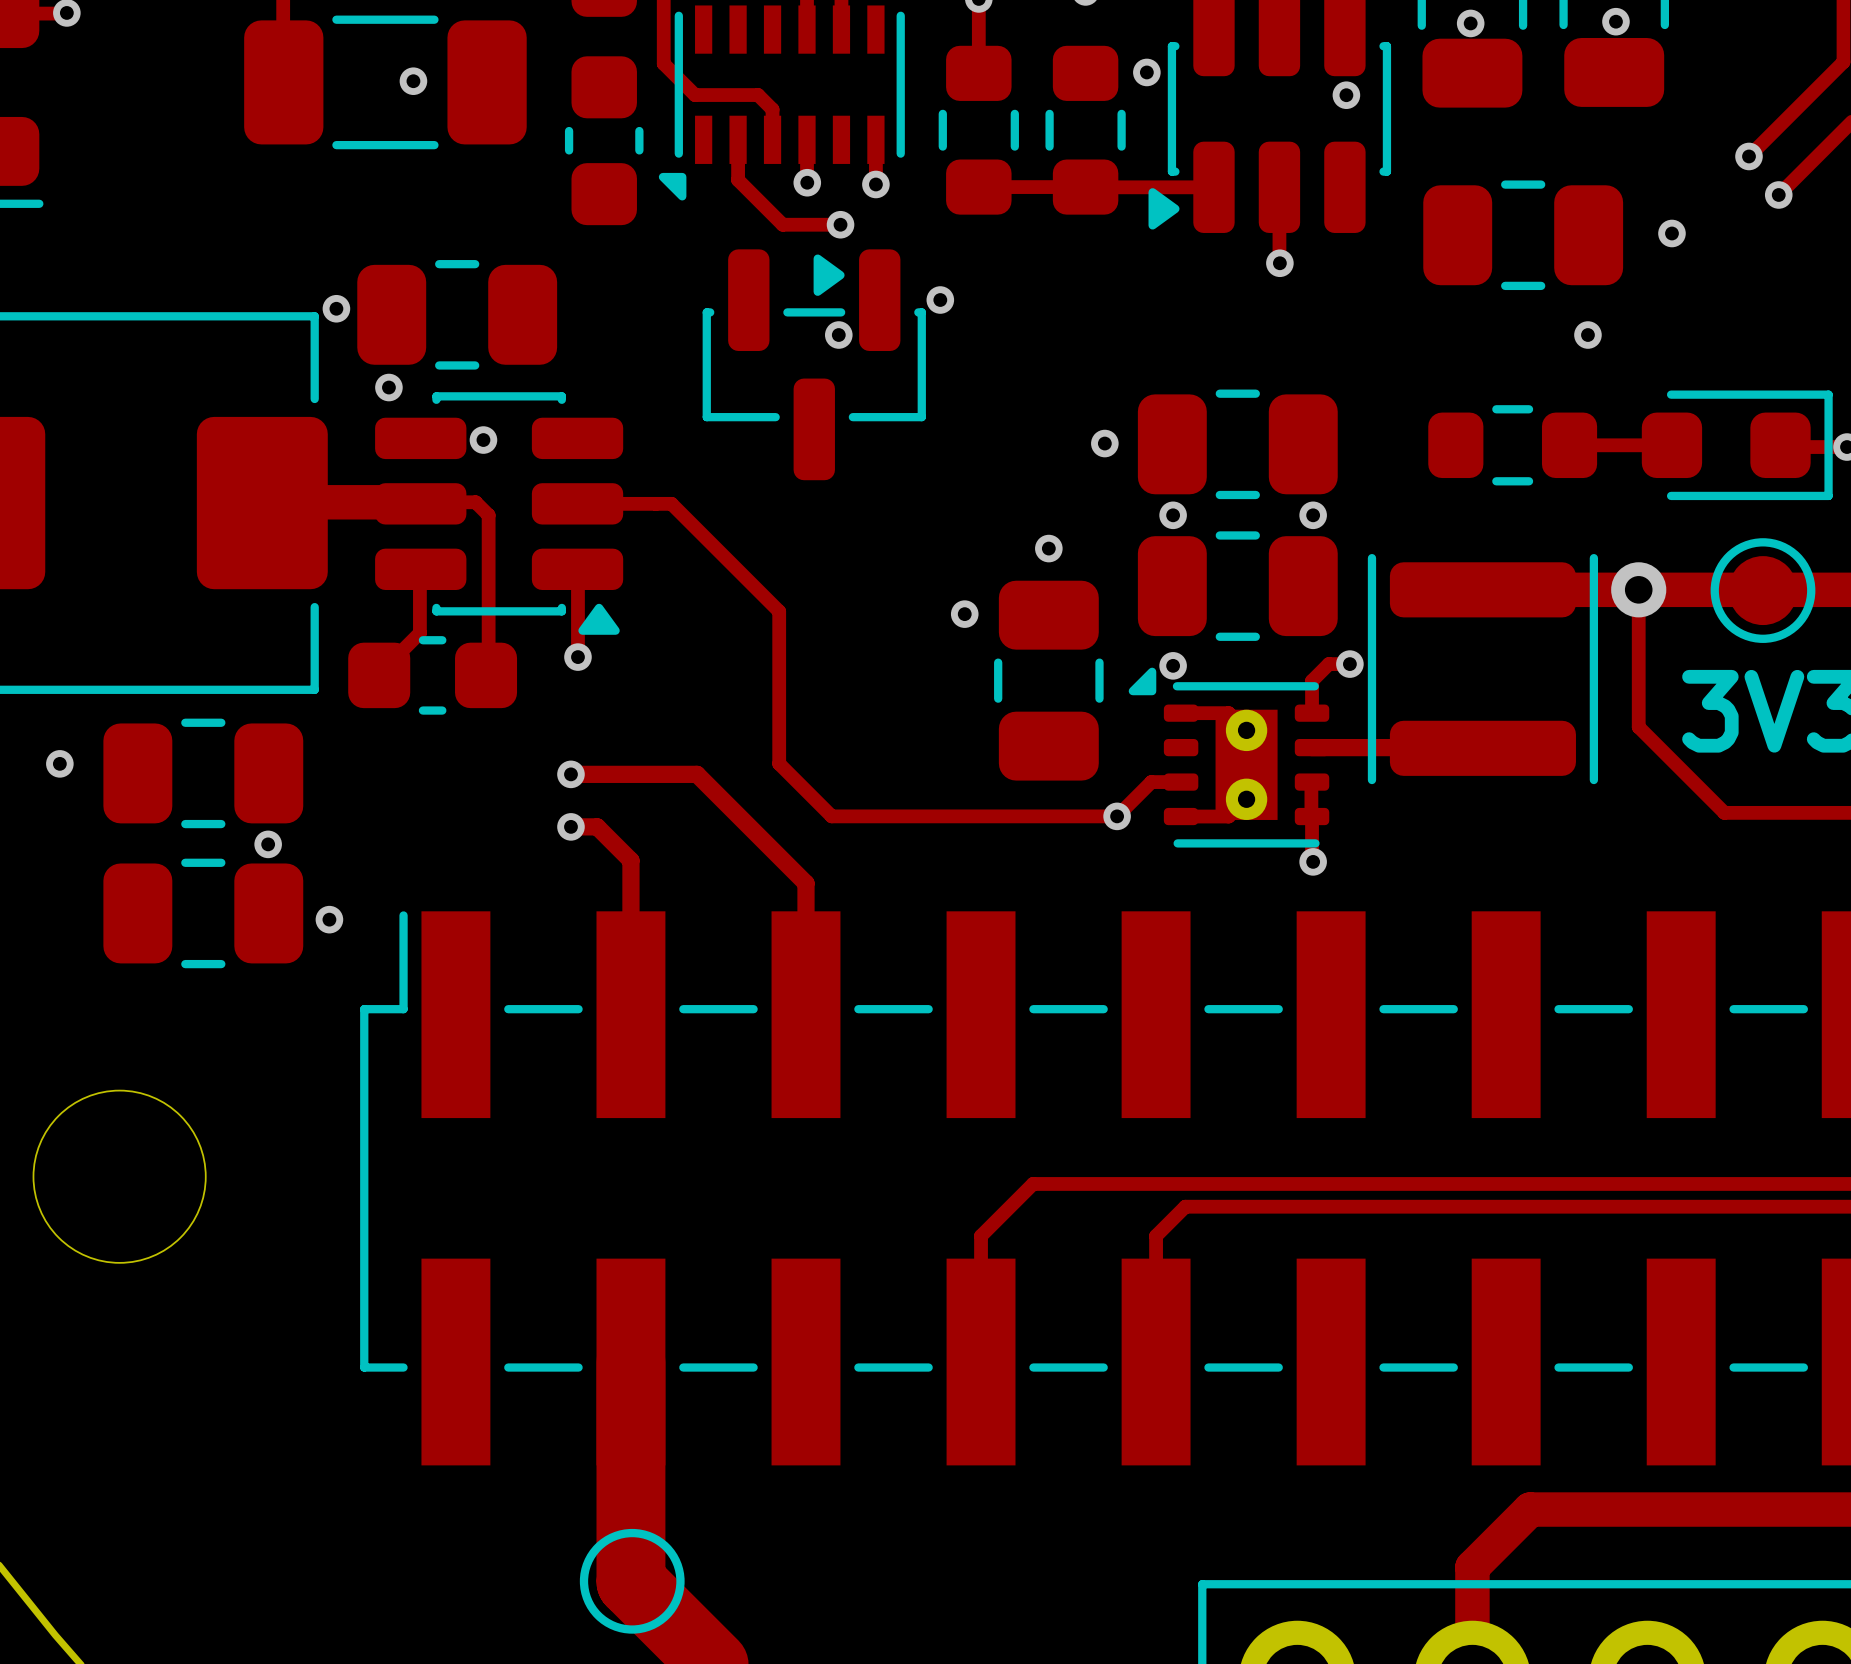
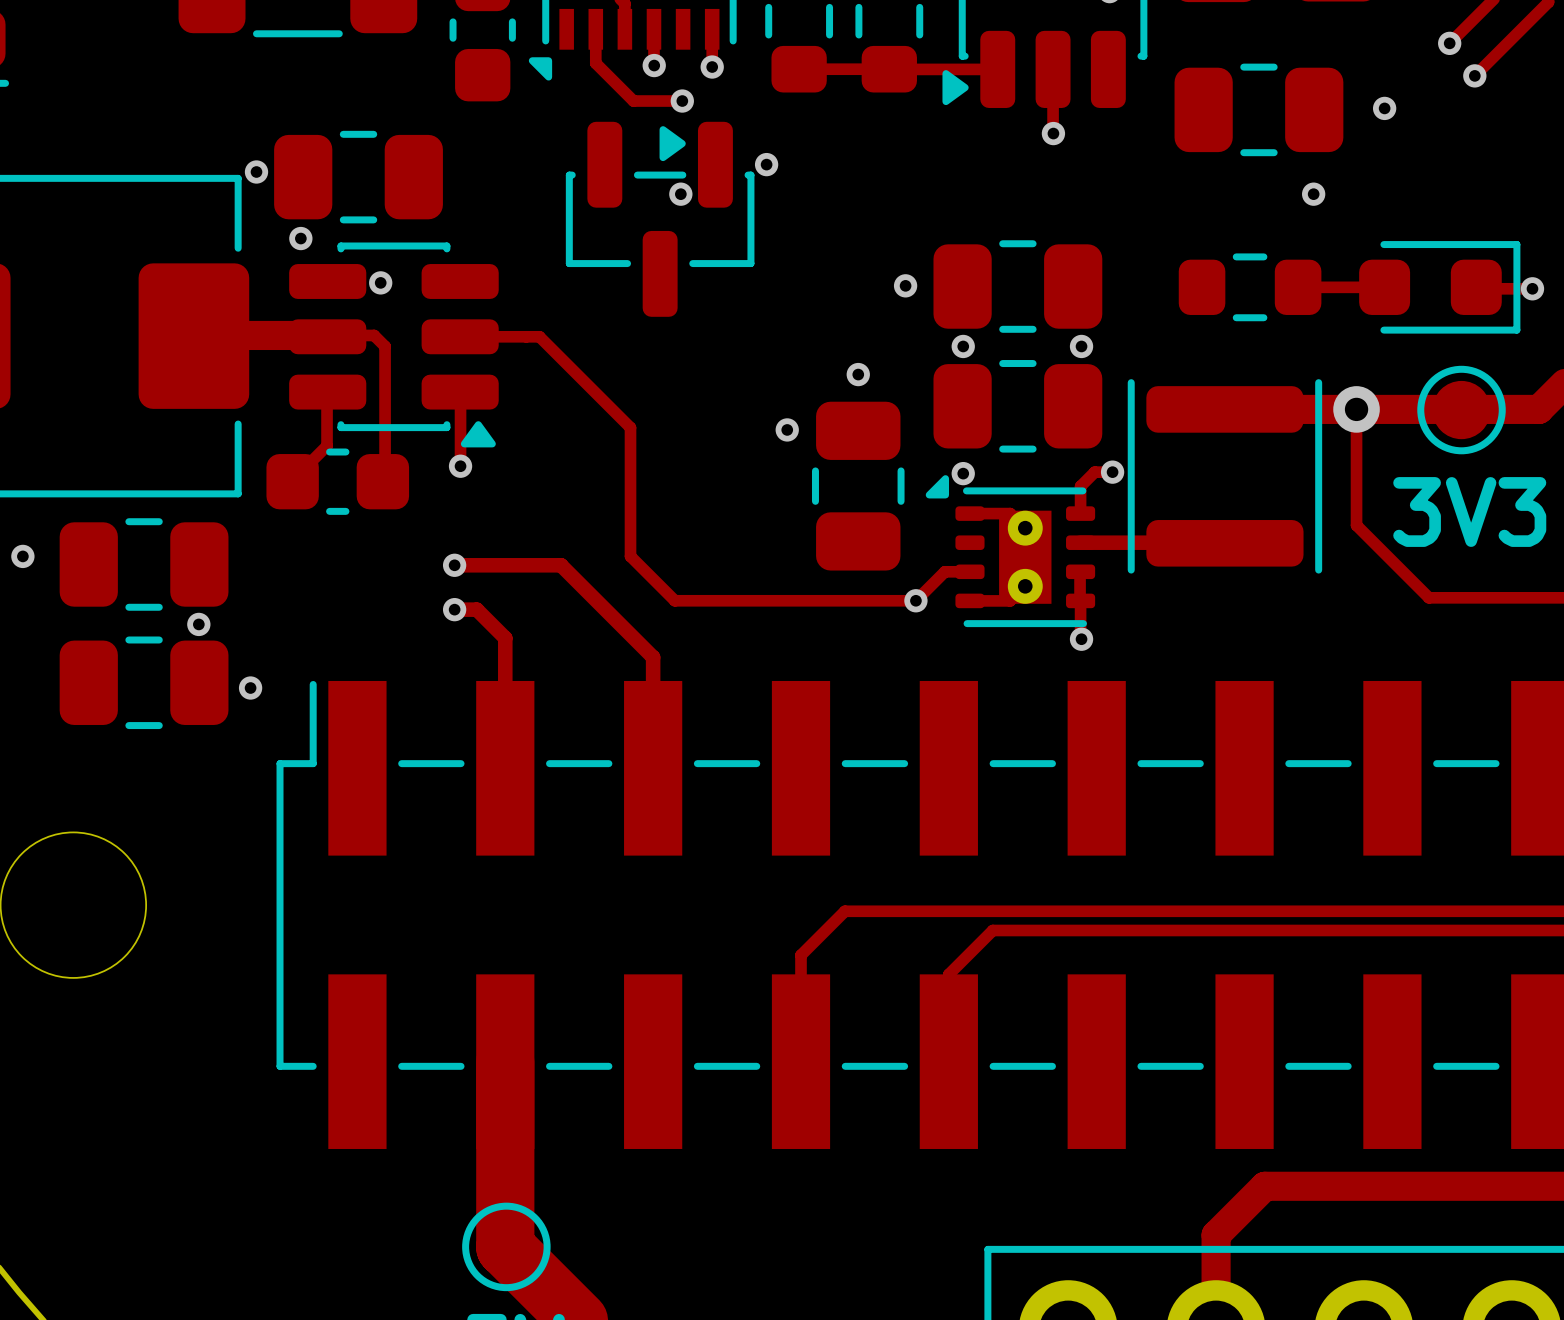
track: (1208, 1206) (1185, 1206) (1156, 1236) (1156, 1258) -> (992, 930) (948, 974)

